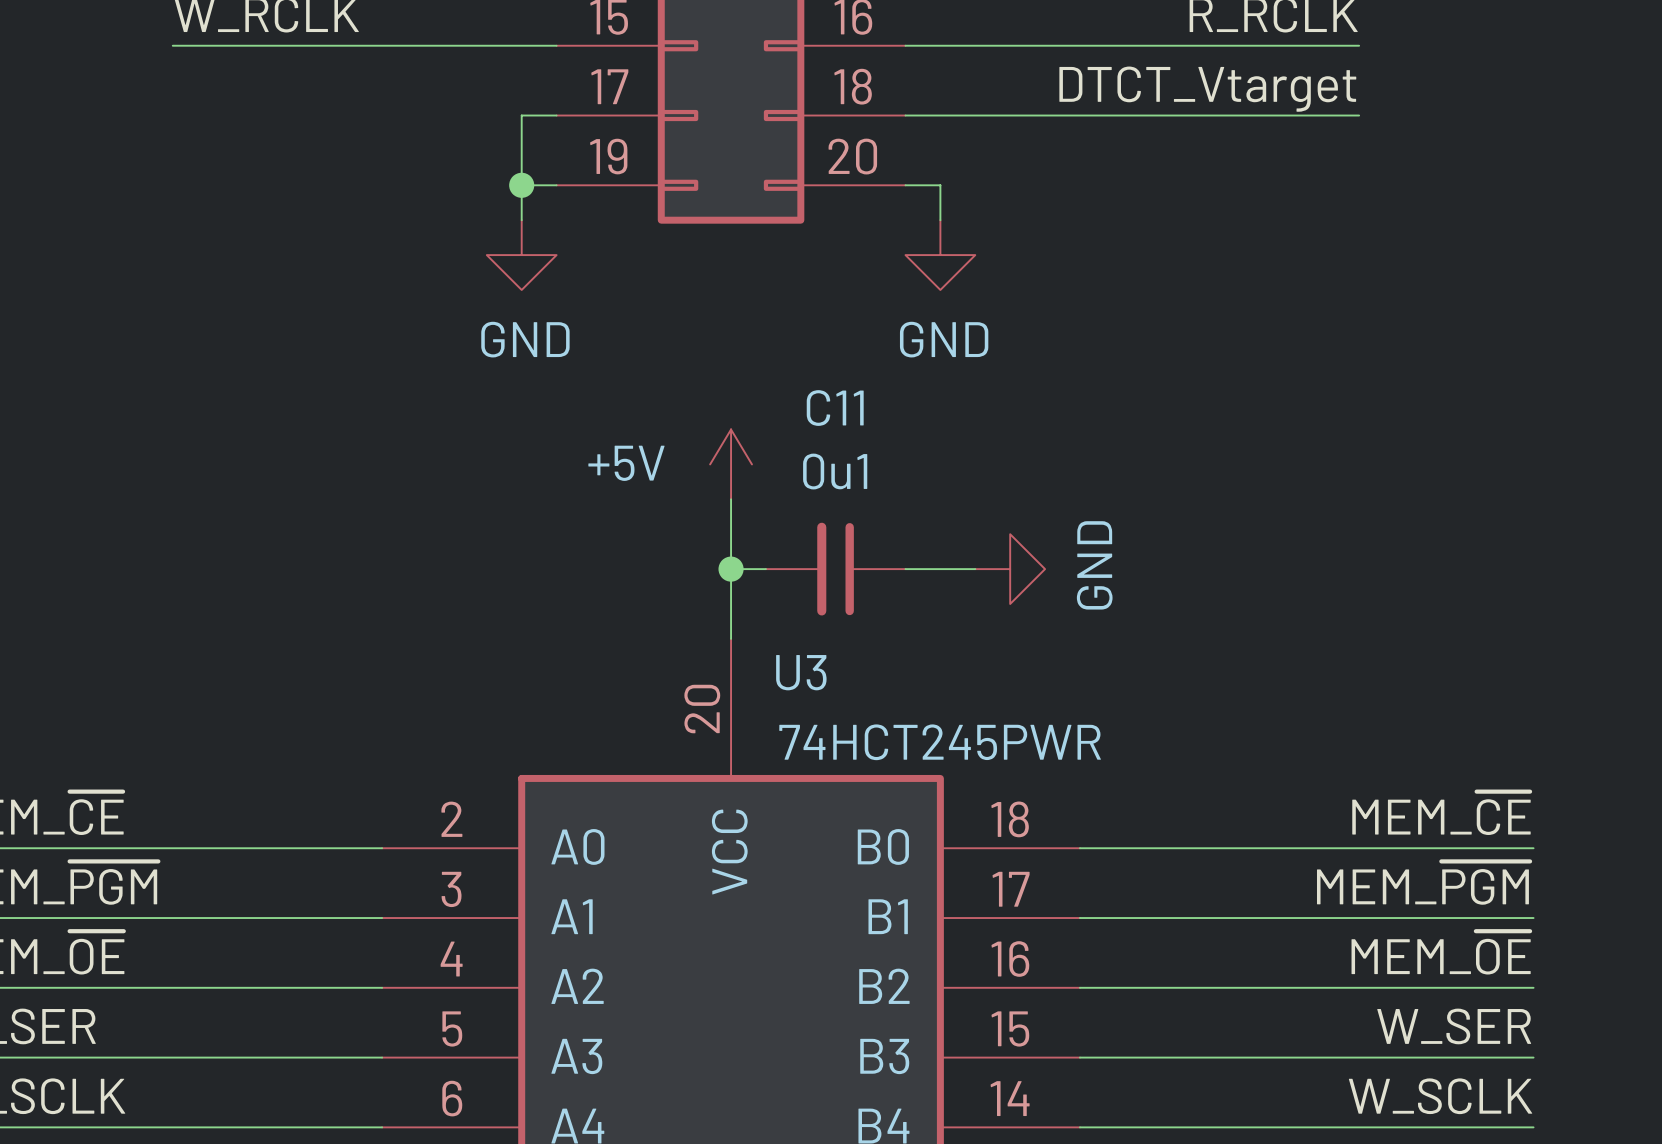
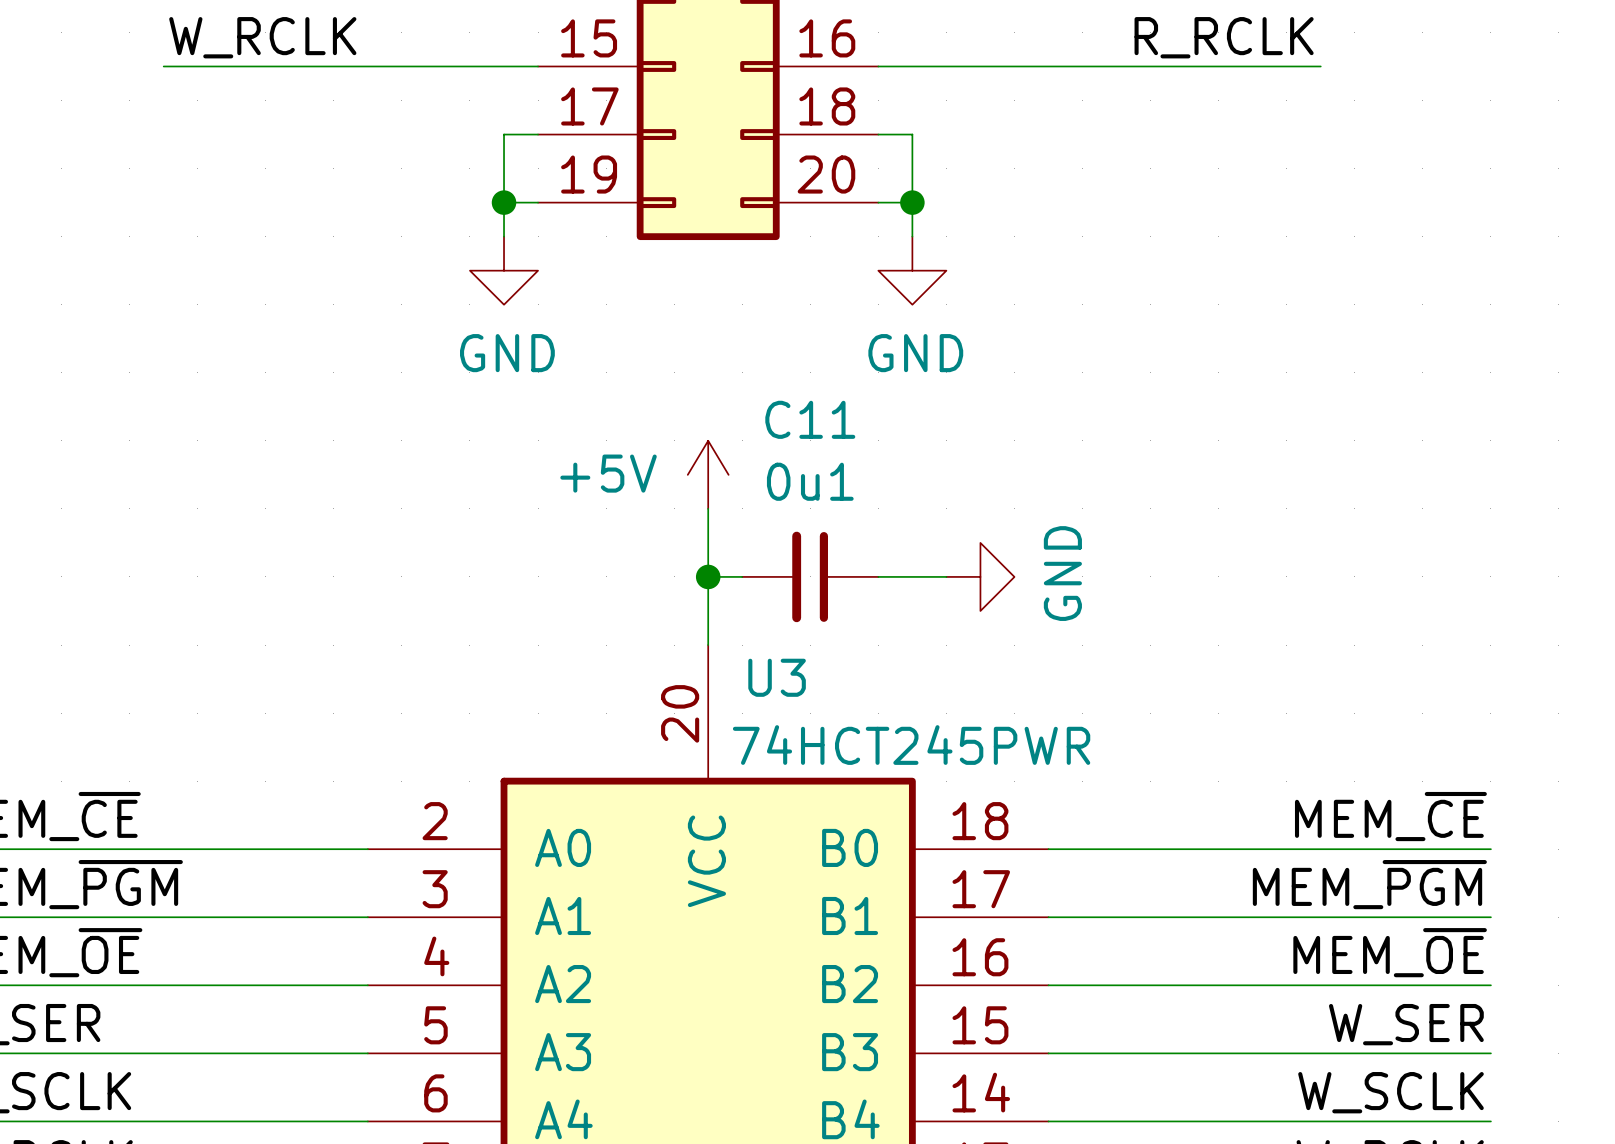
label: DTCT_Vtarget (1207, 89) -> none
wire: (940, 115) (1359, 115) -> (912, 134) (912, 202)
junction: none -> (912, 202)

